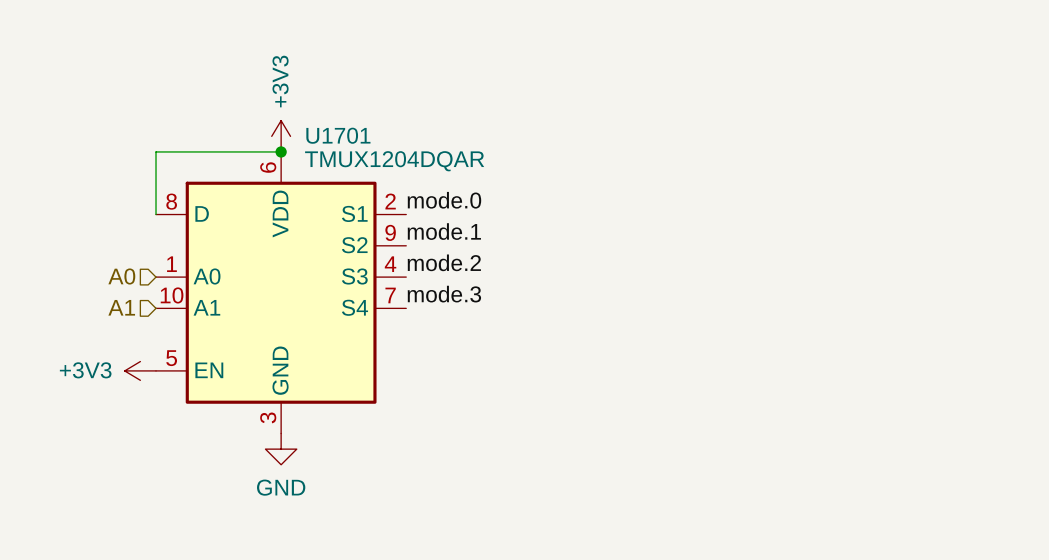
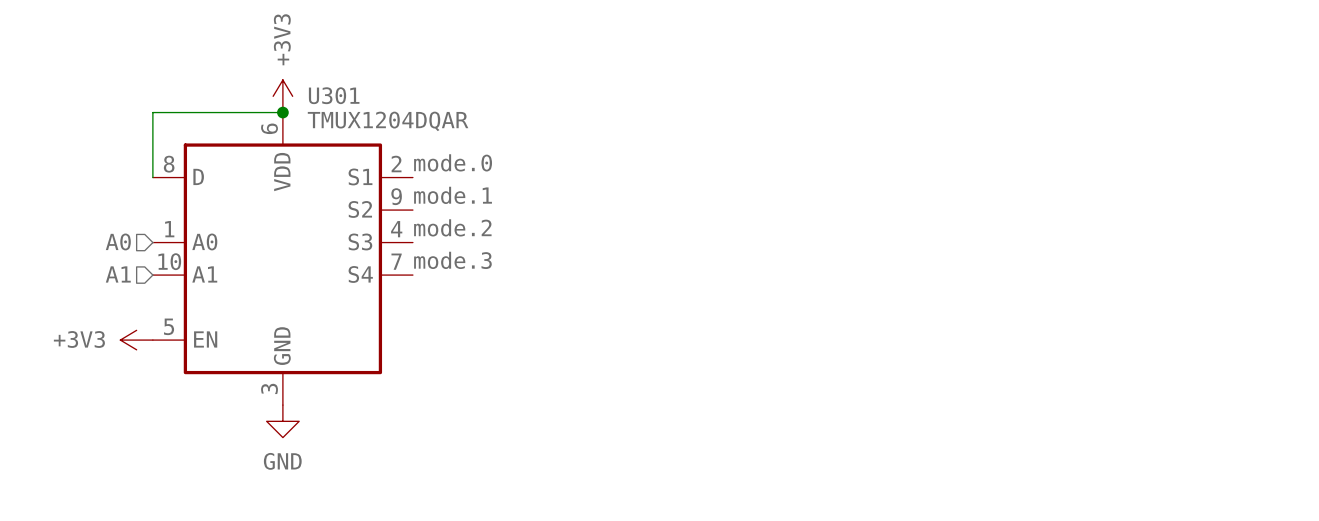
U1701 name: U1701 (338, 135) -> U301 (334, 95)

